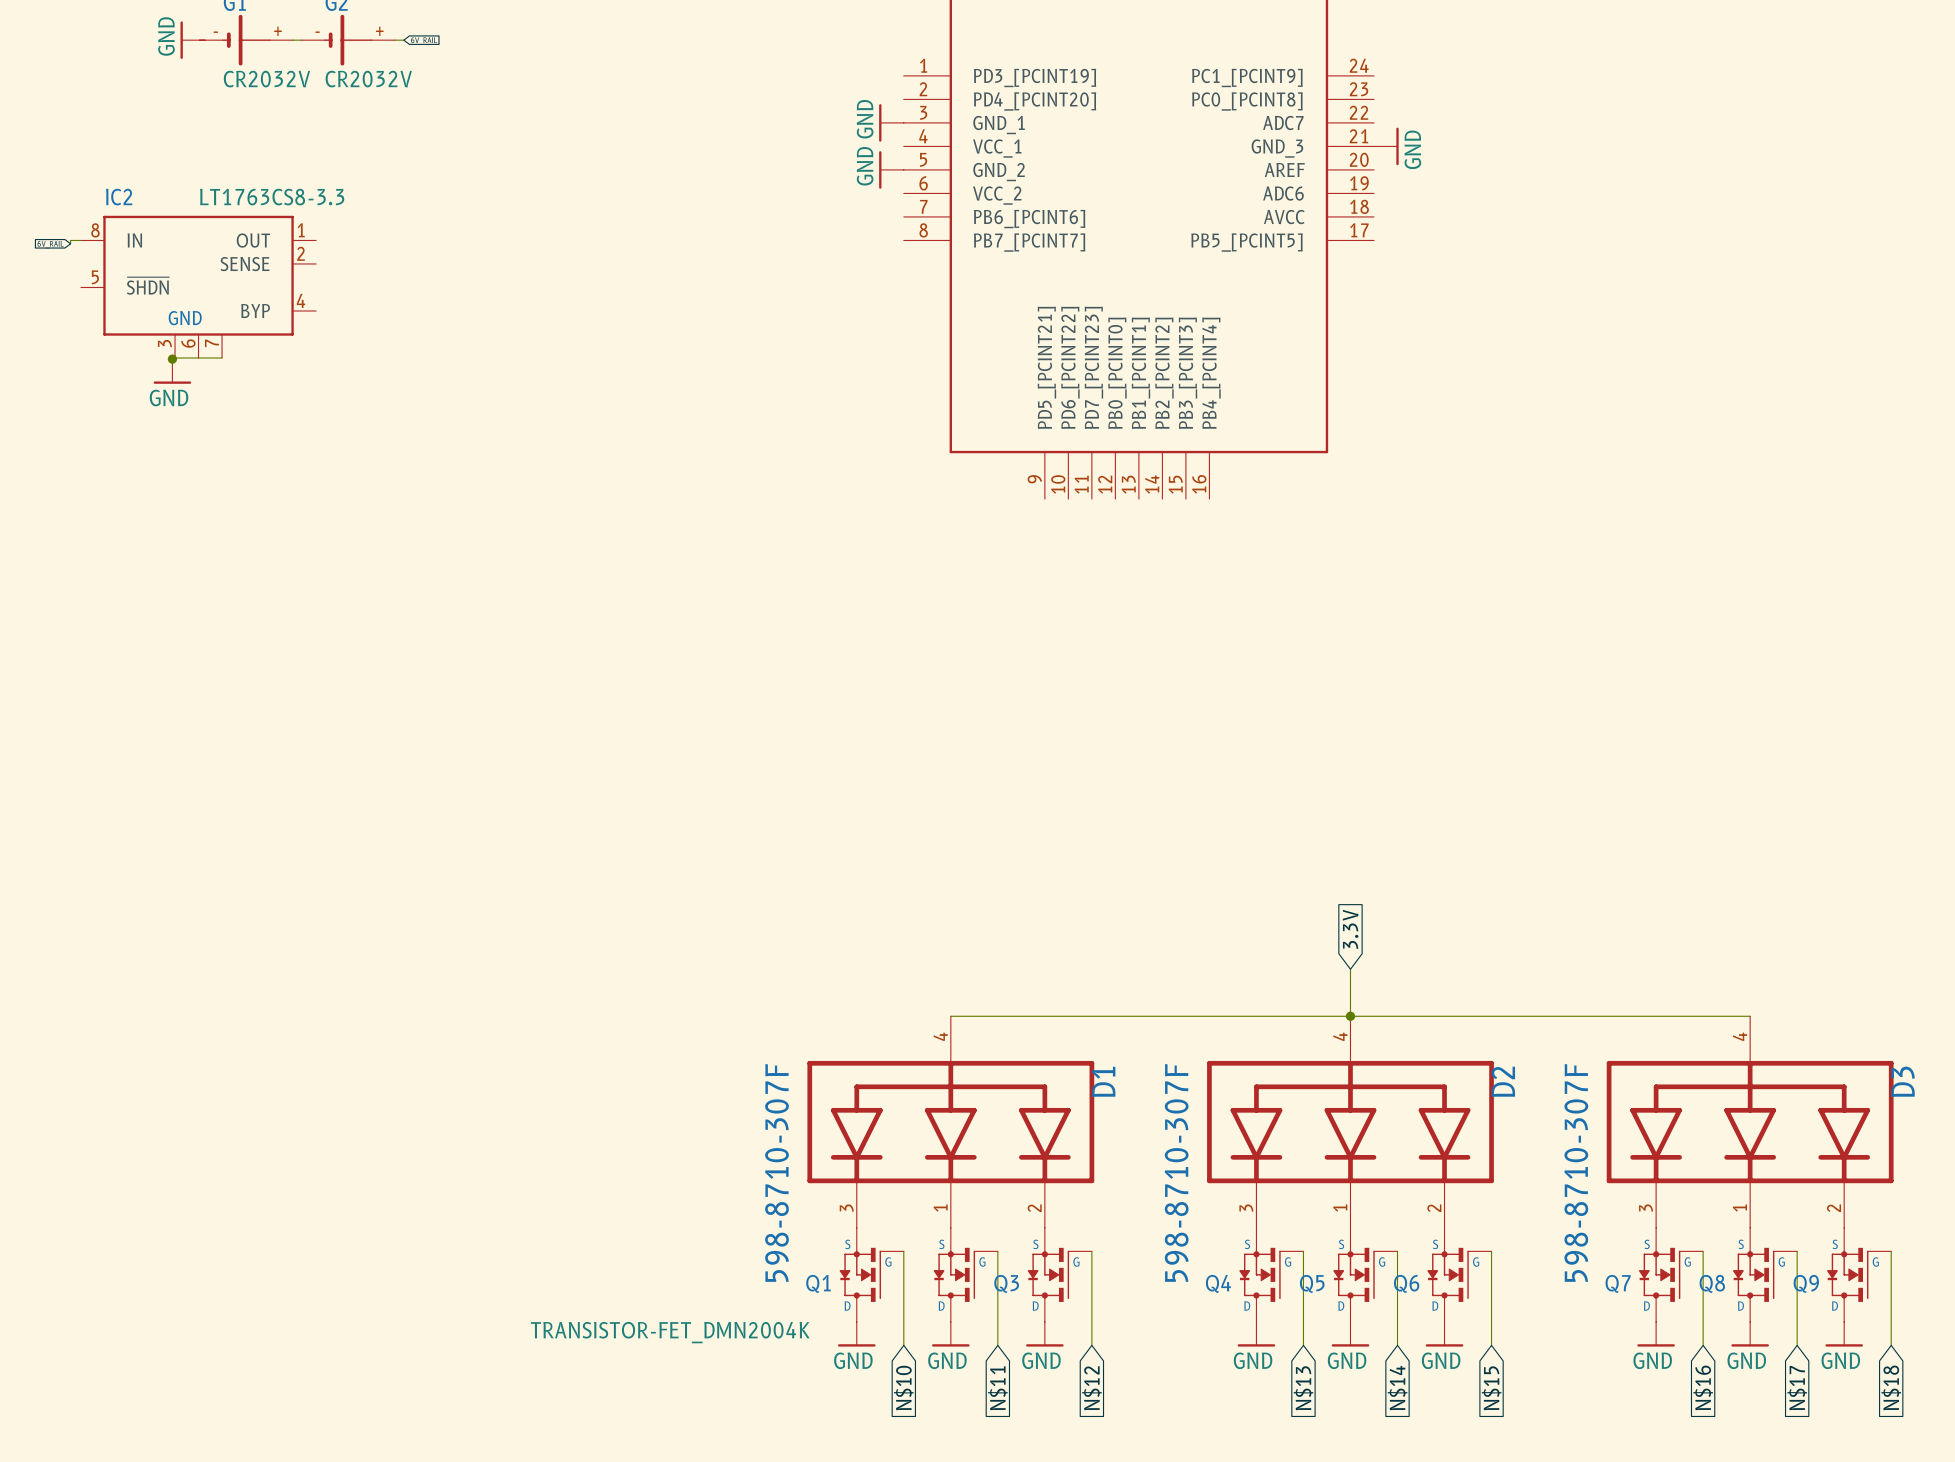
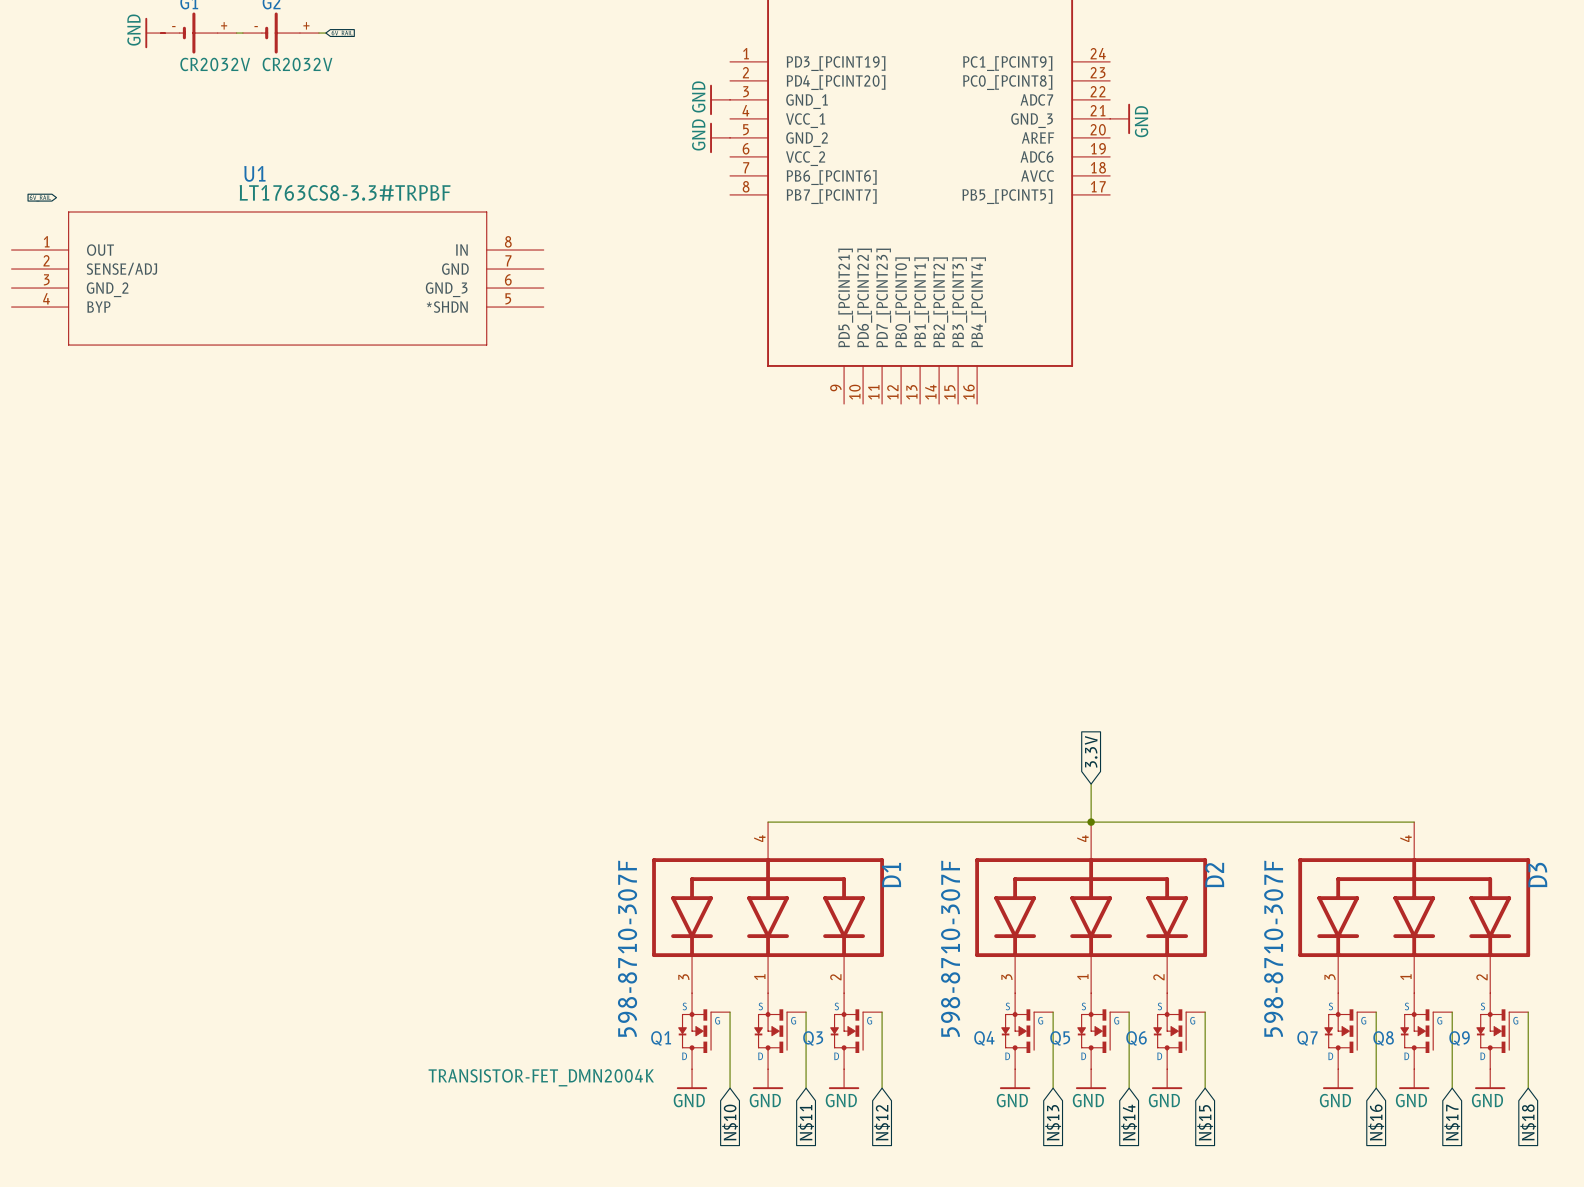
wire: (80, 240) (70, 240) (70, 243) -> none
IC2: LT1763CS8-3.3 (198, 286) -> none
U1: none -> LT1763CS8-3.3#TRPBF (277, 278)
wire: (222, 358) (172, 358) (172, 364) -> none
junction: (172, 359) -> none
power symbol: GND (172, 371) -> none

